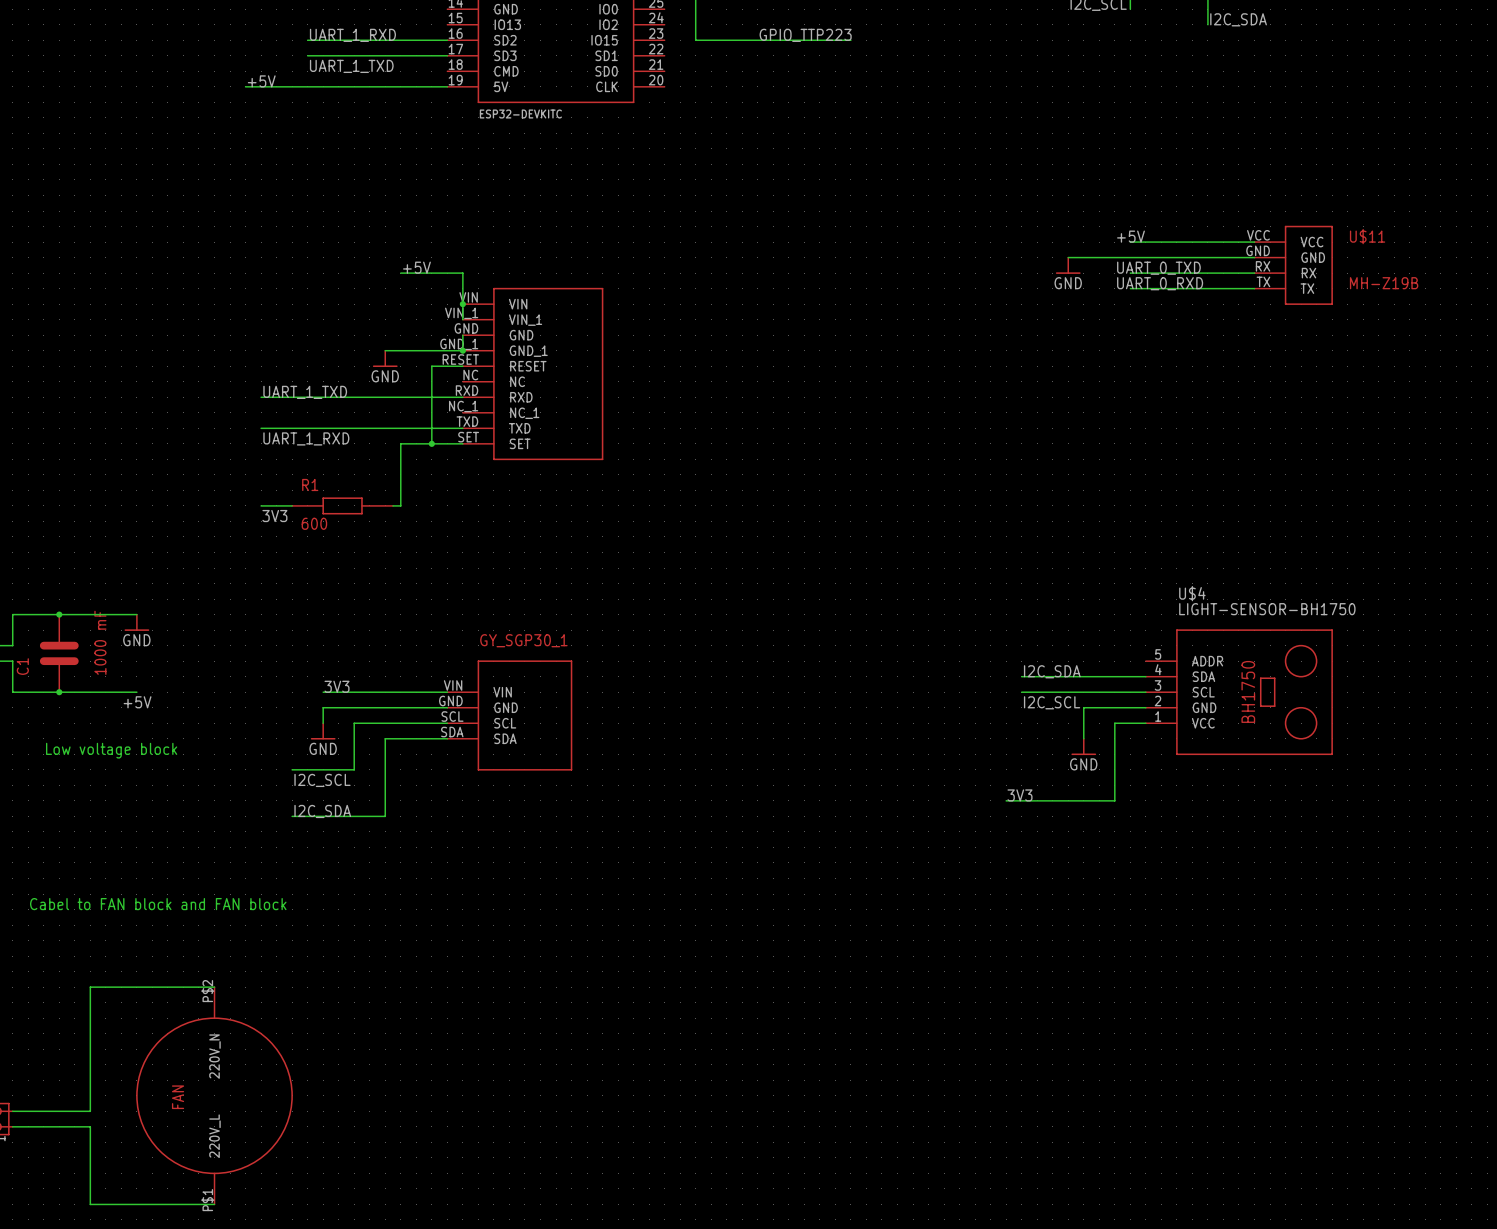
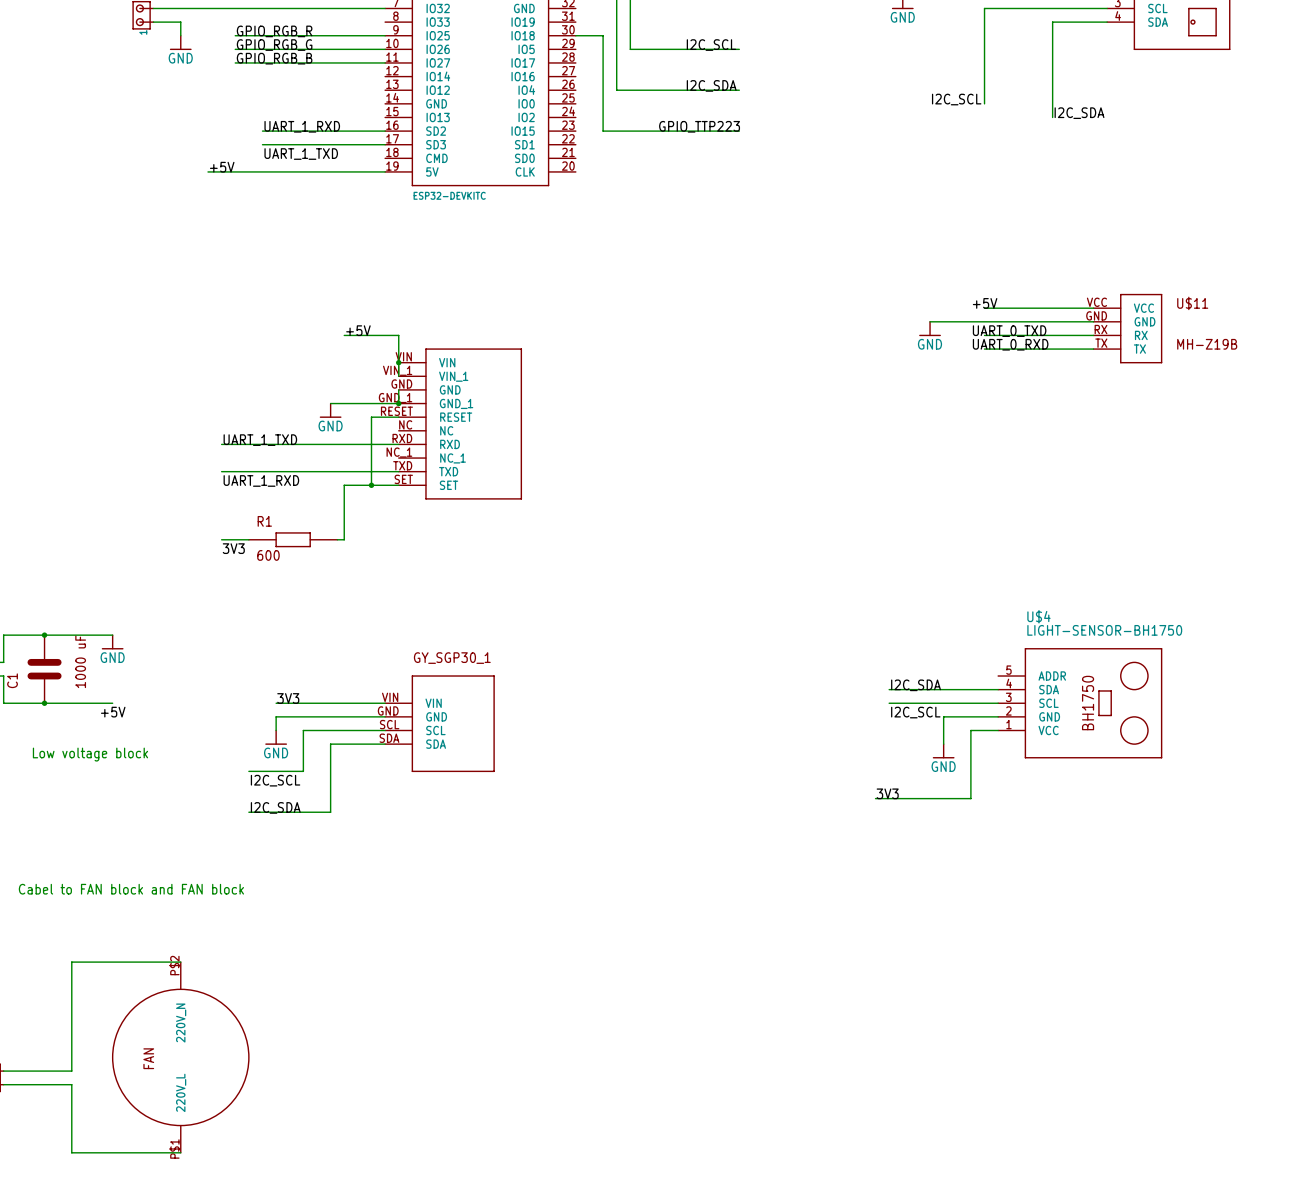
C1 value: 1000 mF (100, 642) -> 1000 uF (80, 661)

